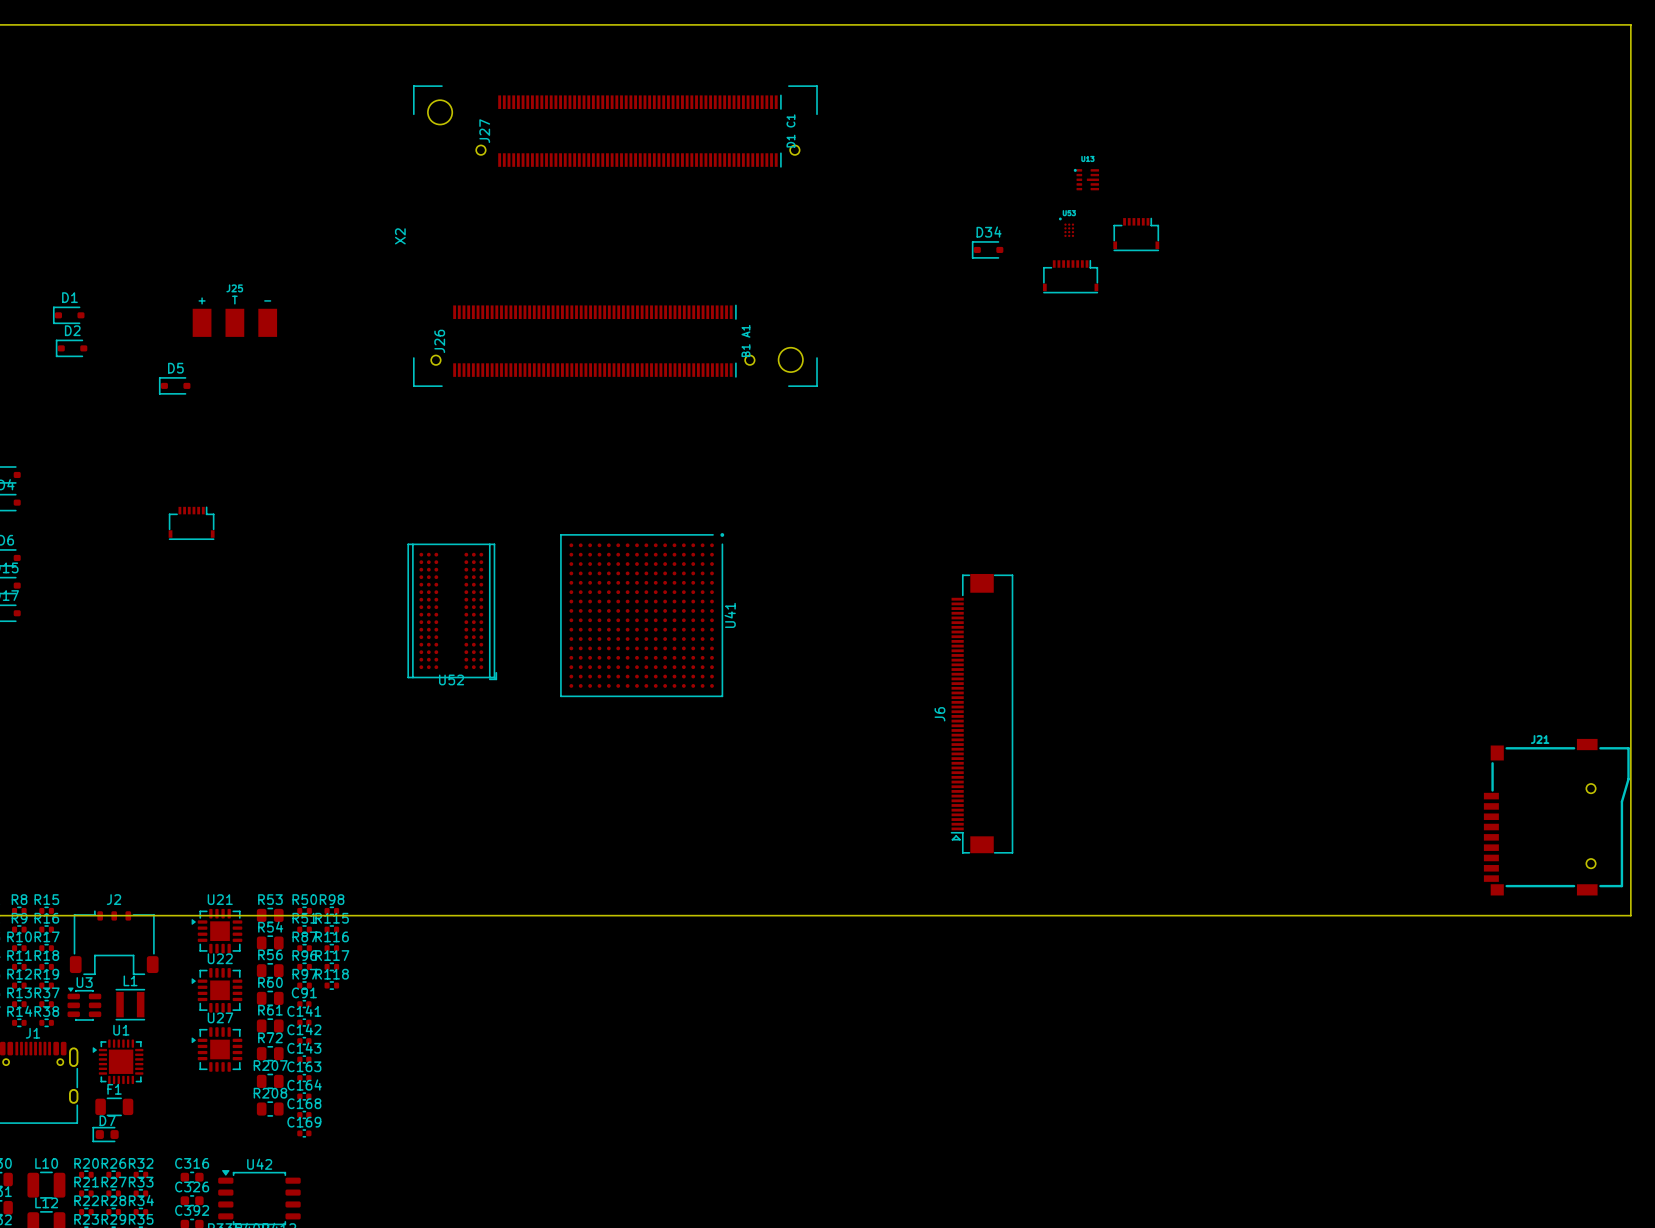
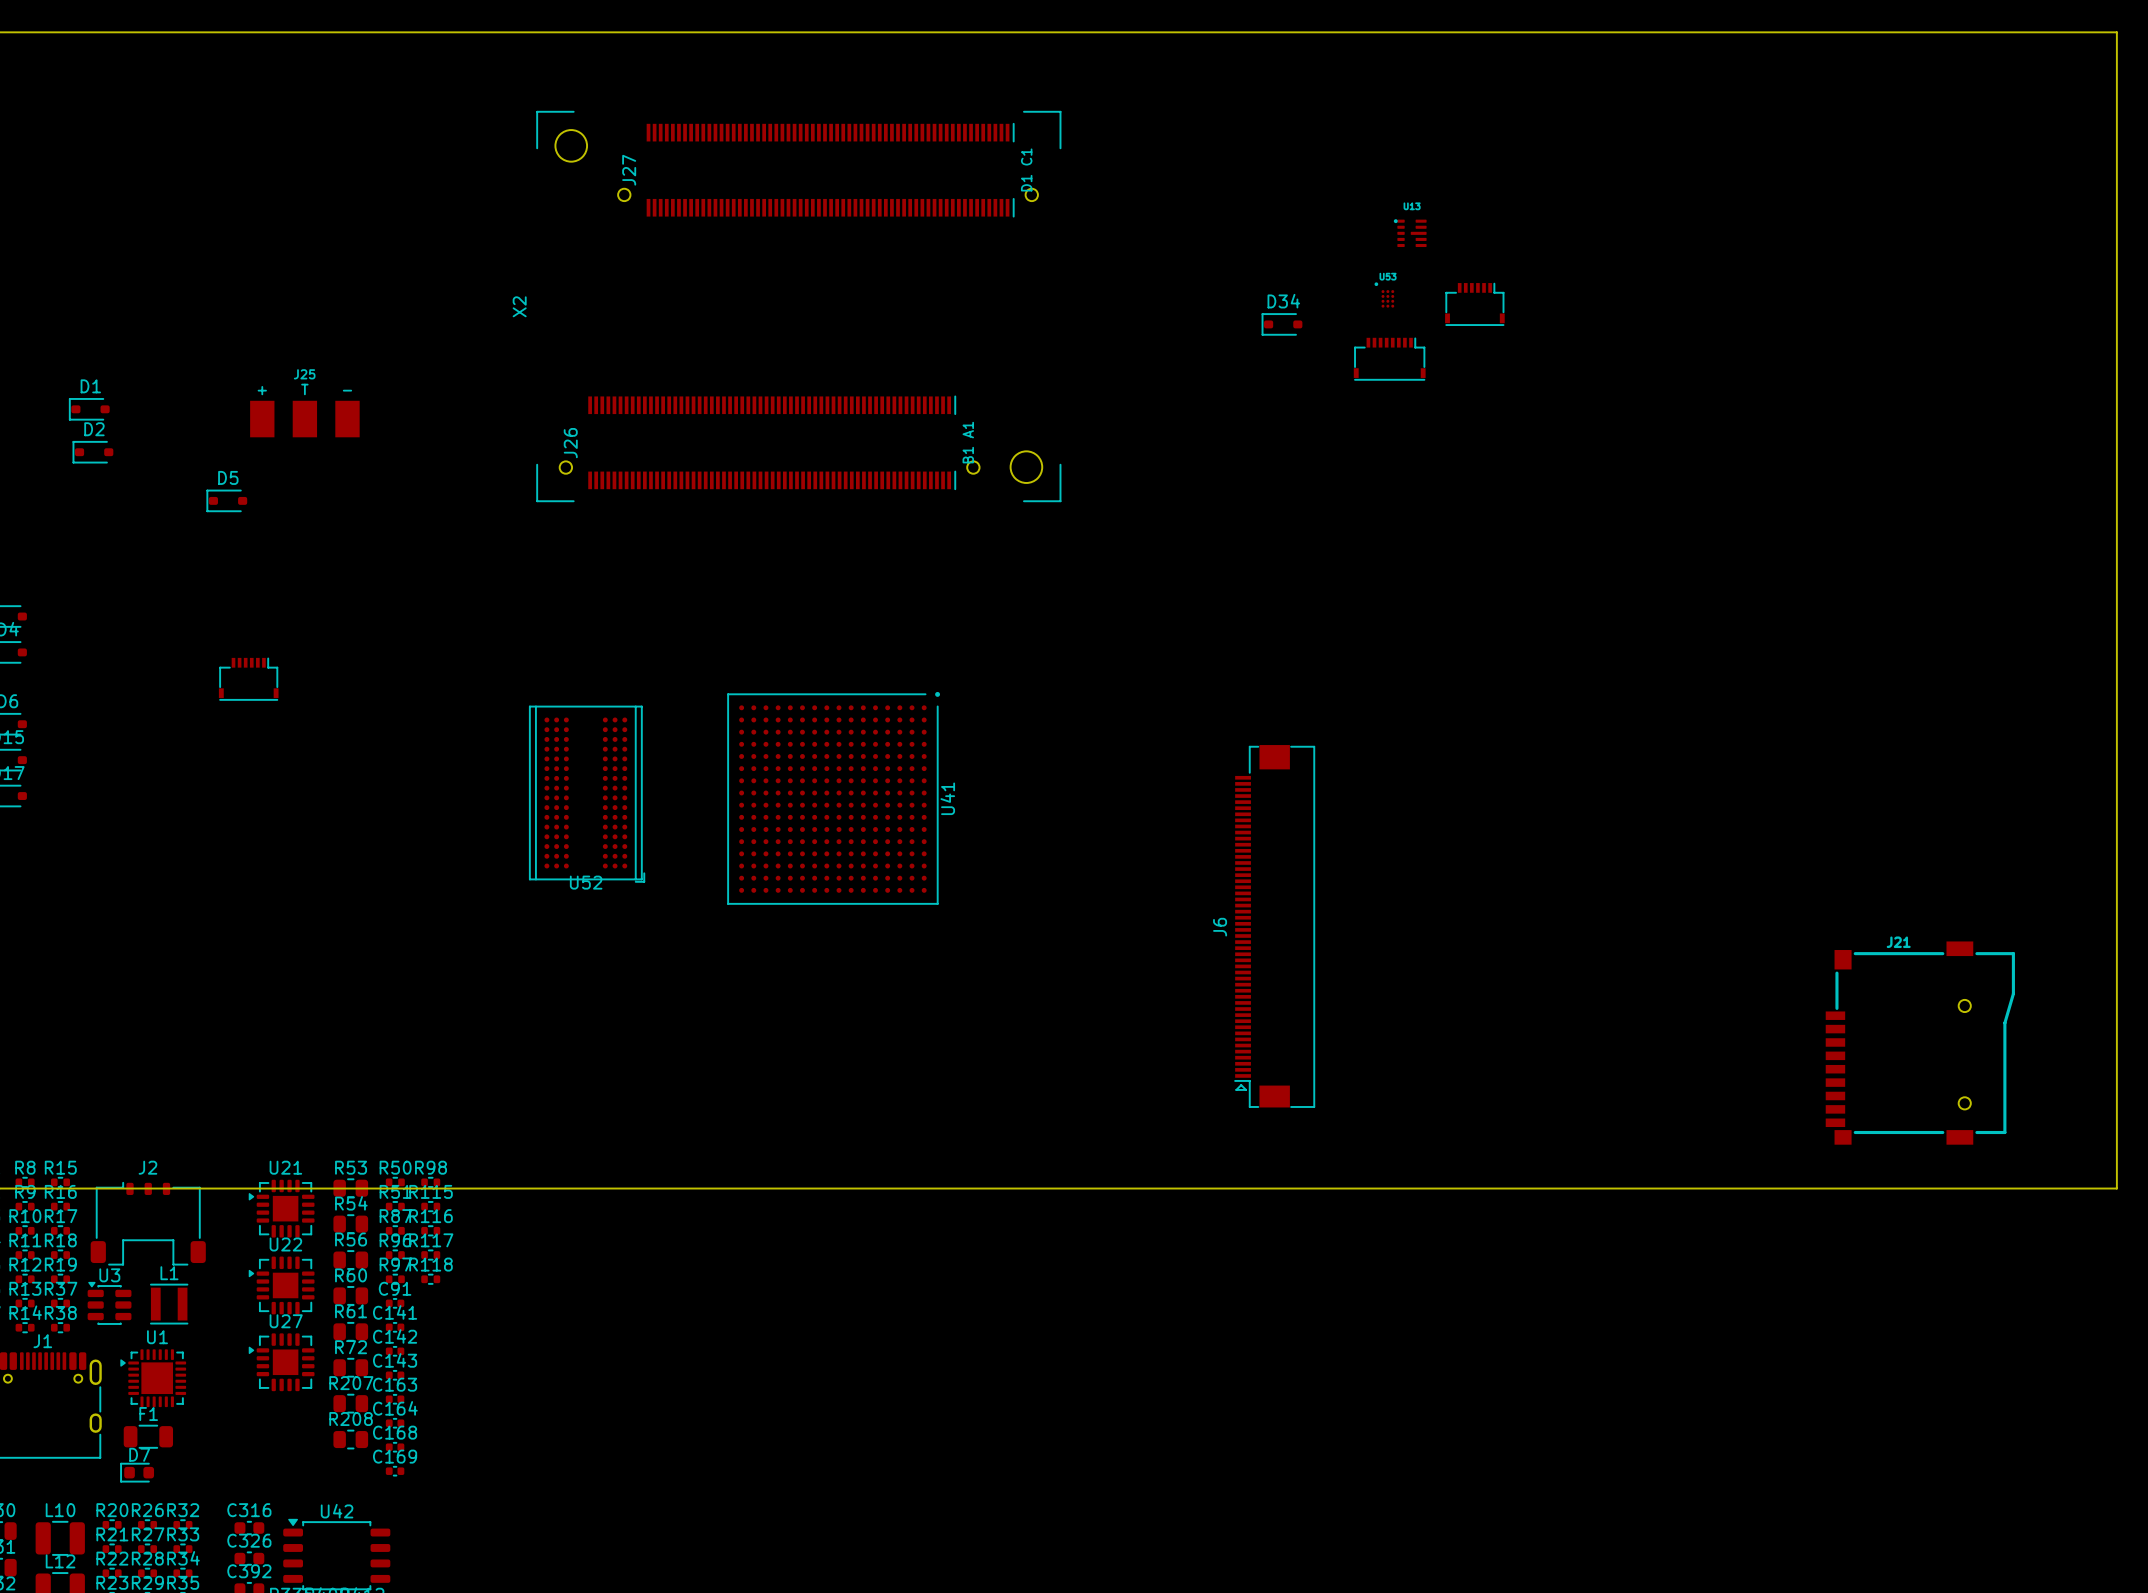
J21 position: (1556, 817) -> (1920, 1043)

